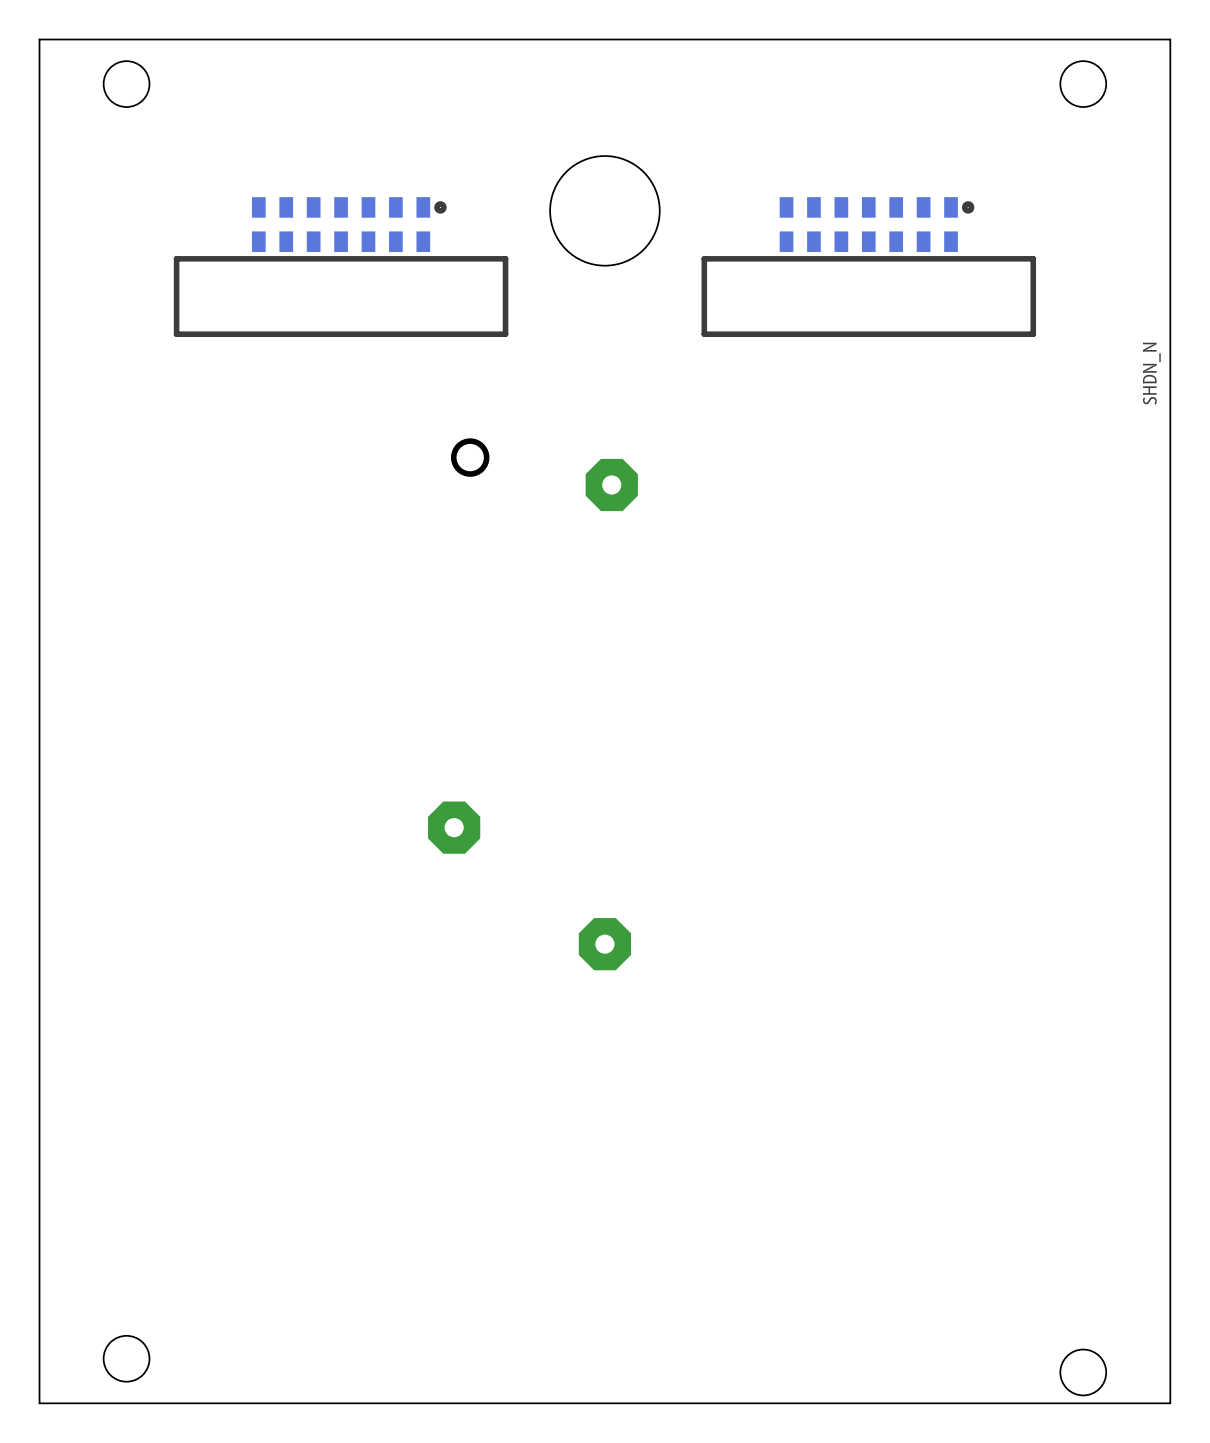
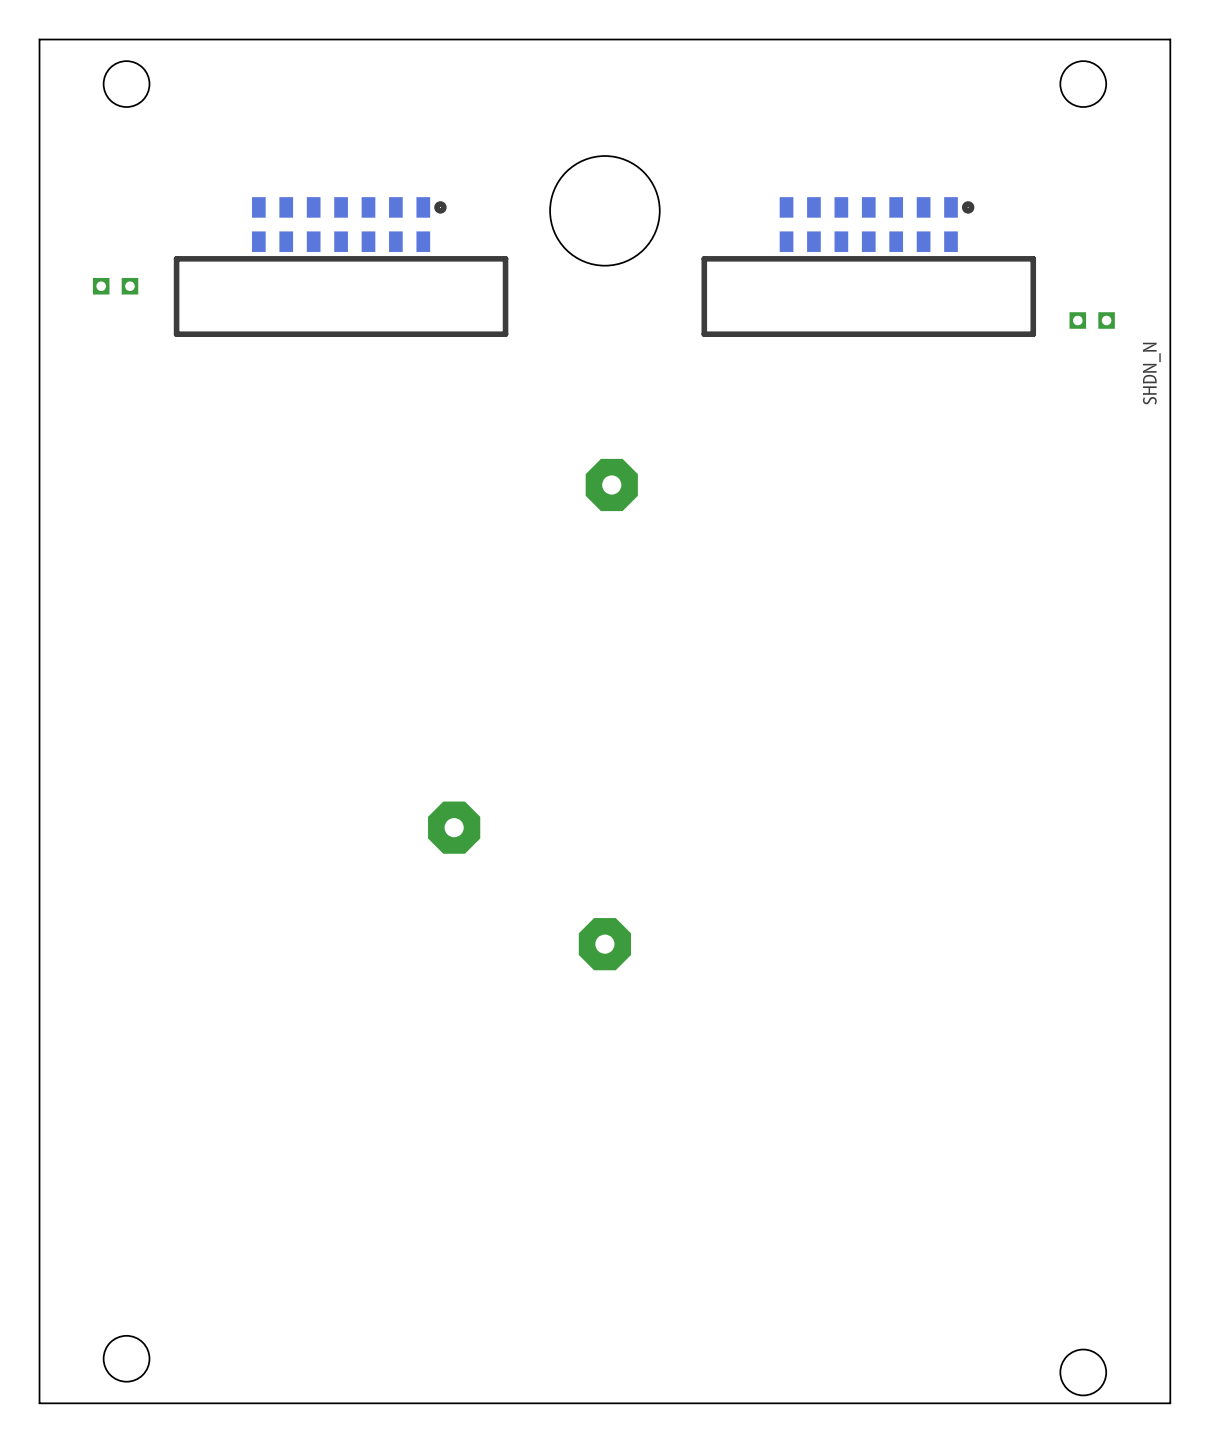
part: none -> (115, 286)
part: none -> (1092, 320)
round board edge: [450, 438, 490, 477] -> none

